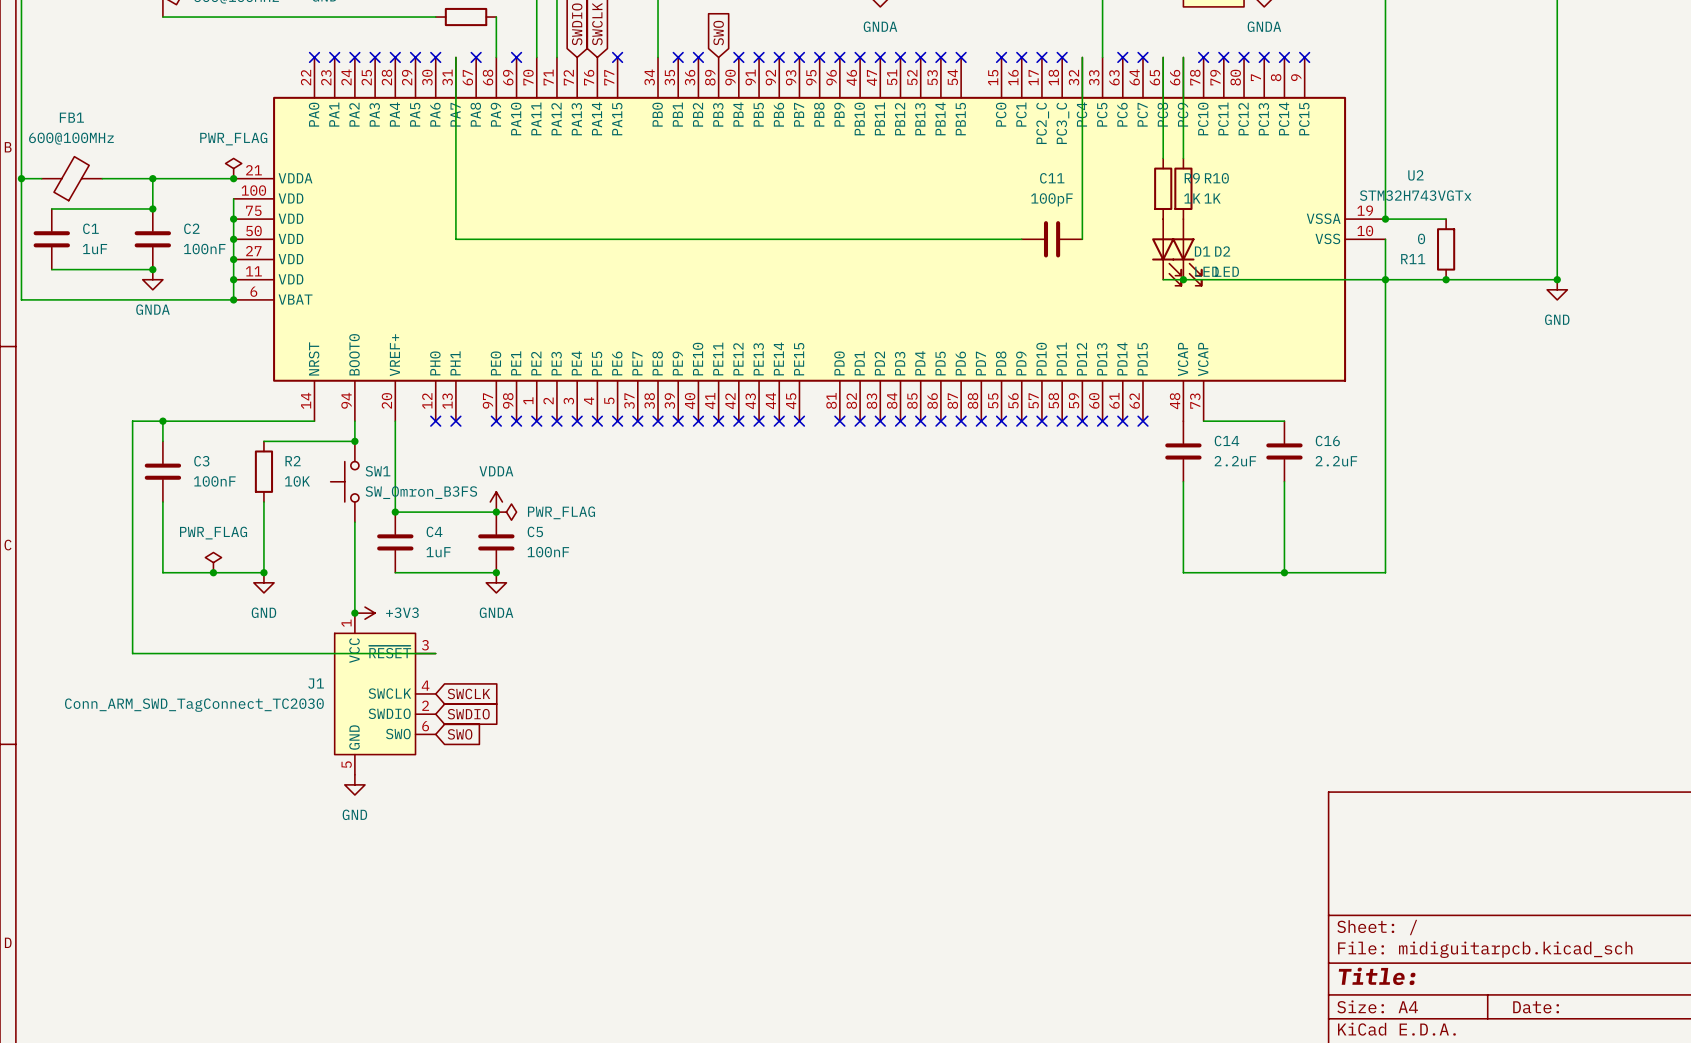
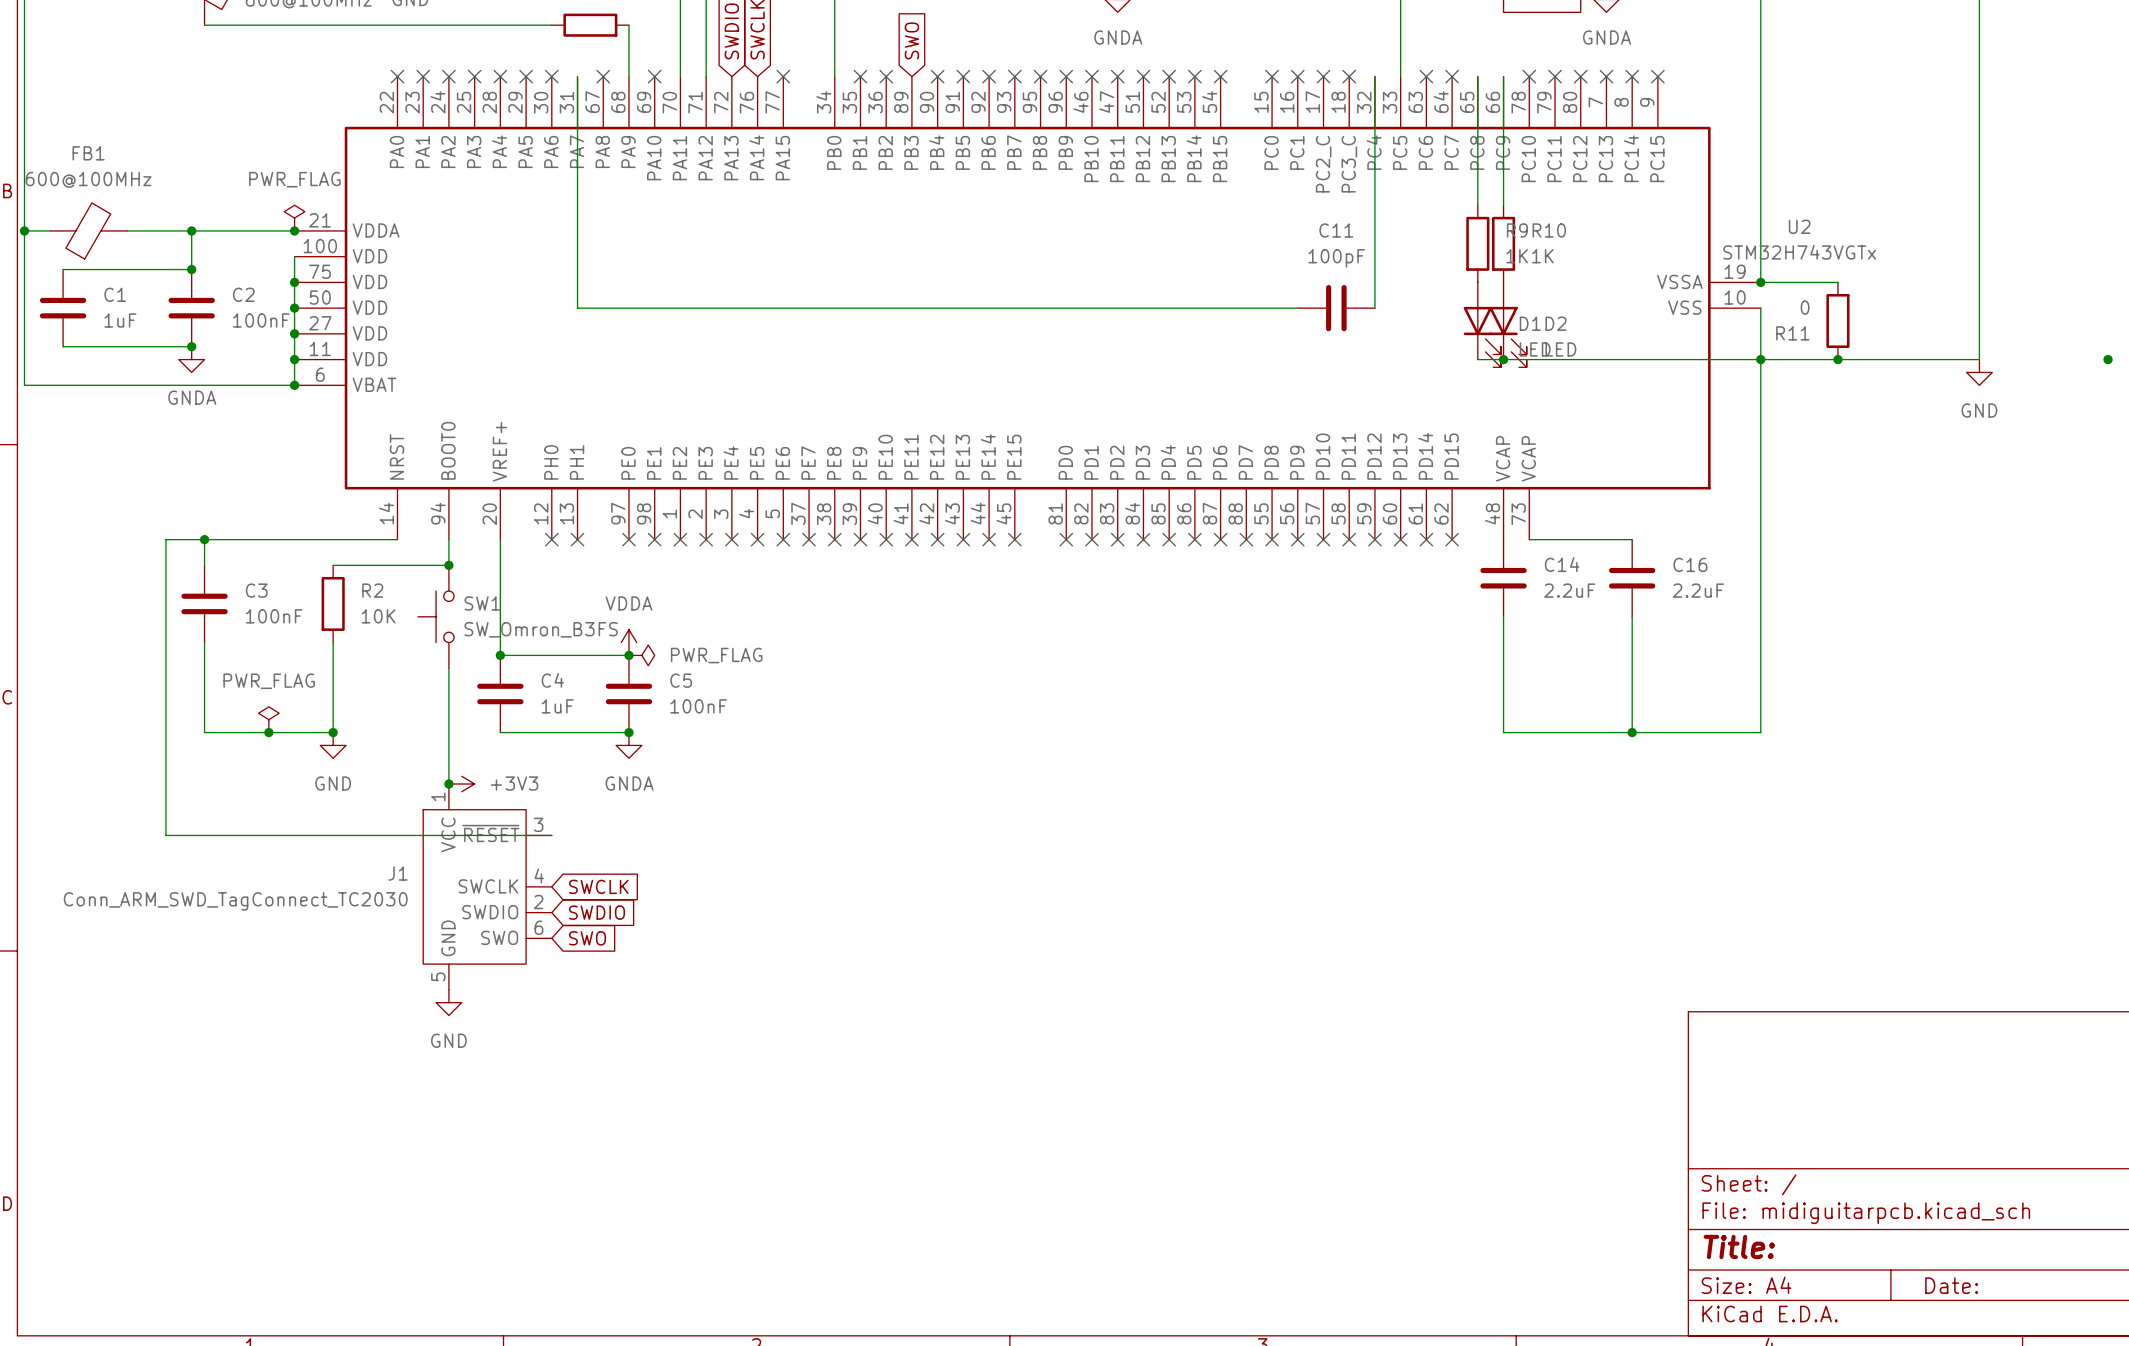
junction: (1557, 279) -> none
junction: none -> (2108, 359)

